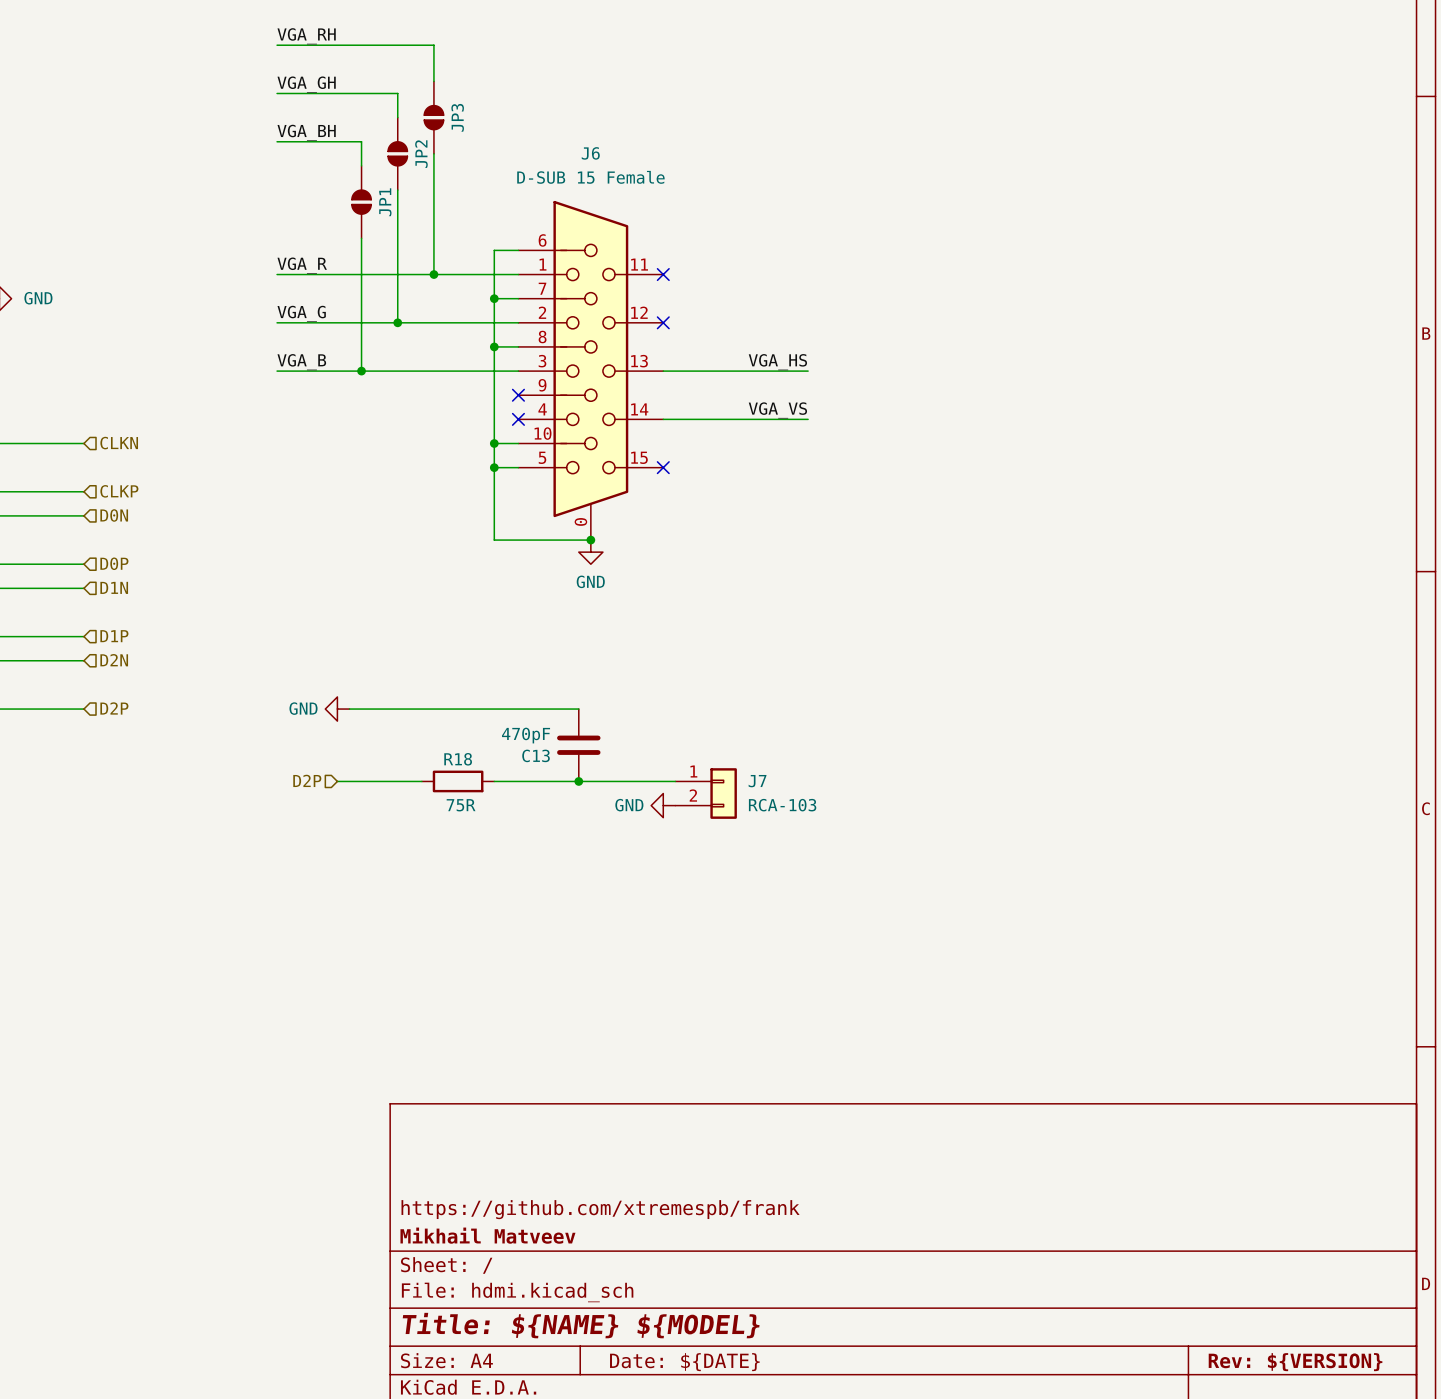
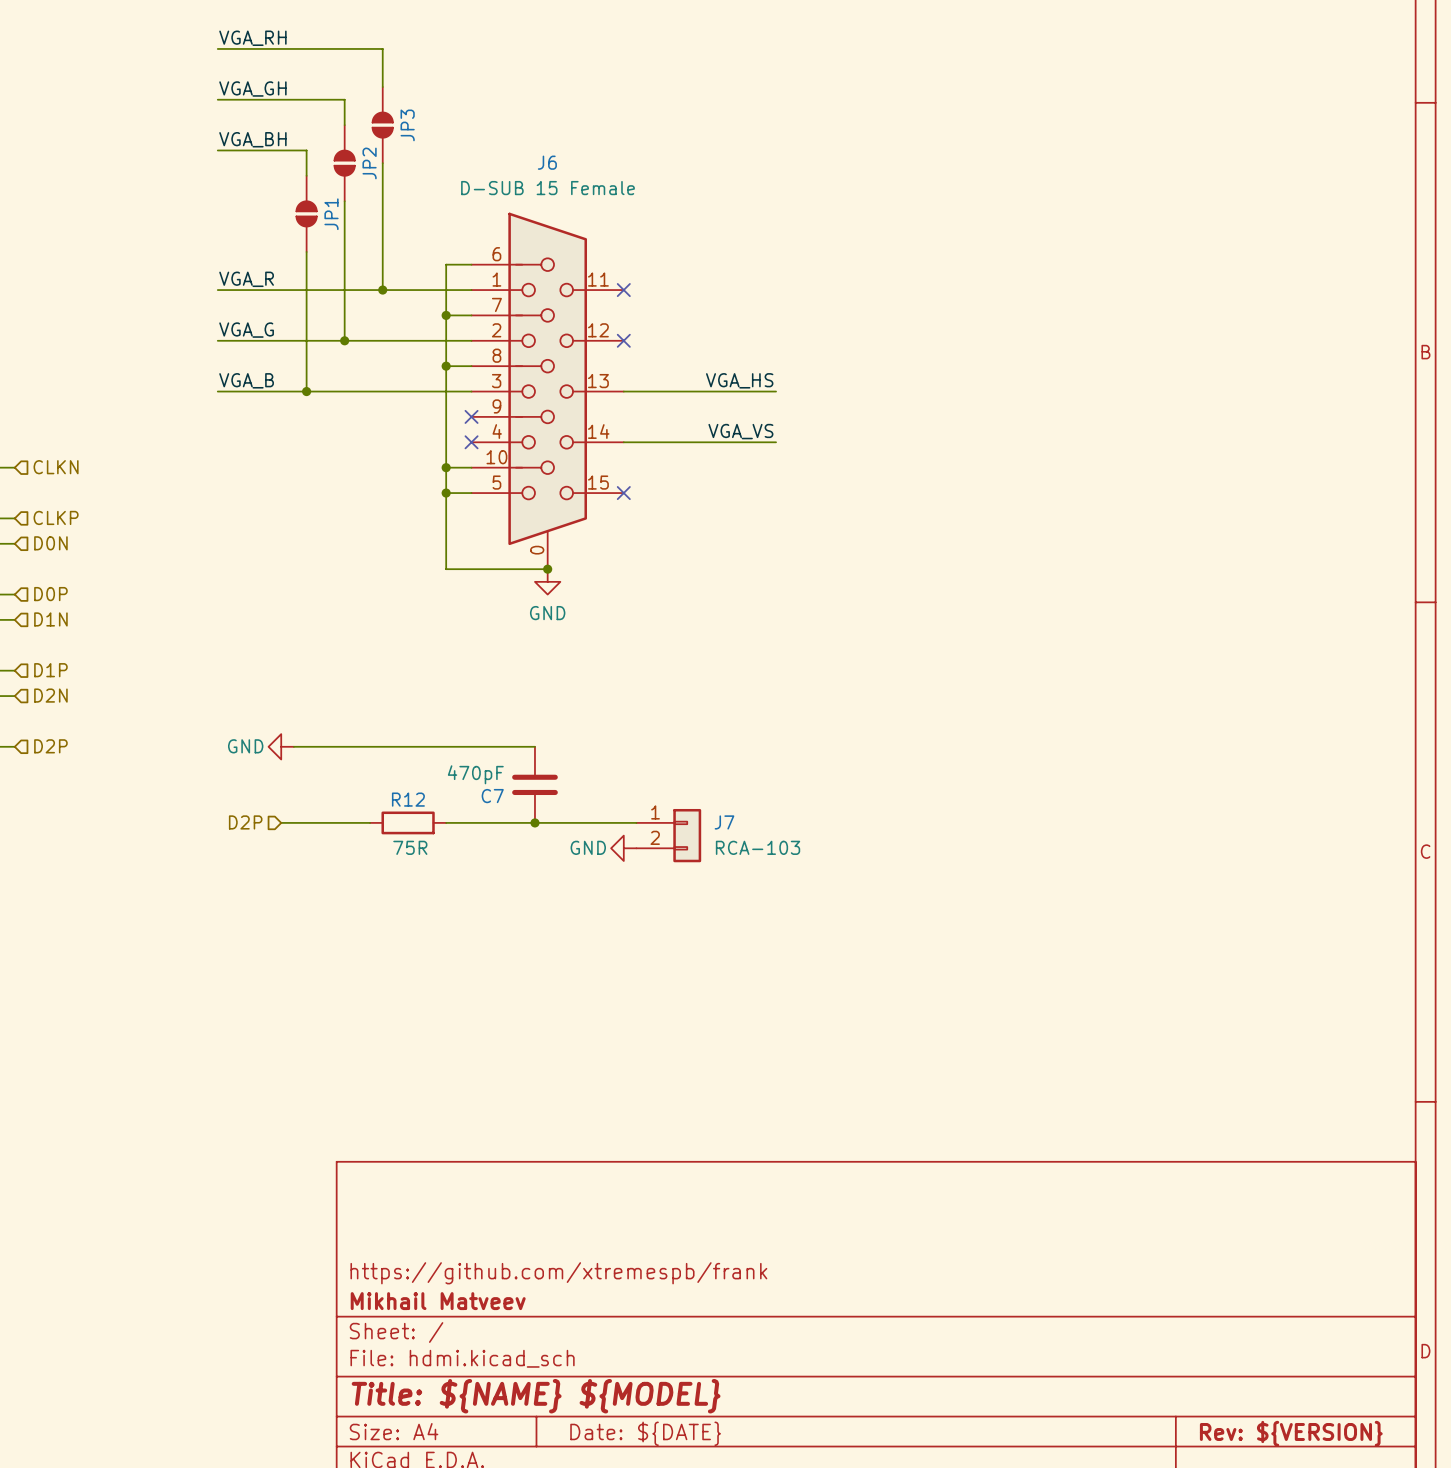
C13 name: C13 (536, 755) -> C7 (492, 796)
R18 name: R18 (458, 759) -> R12 (408, 799)

